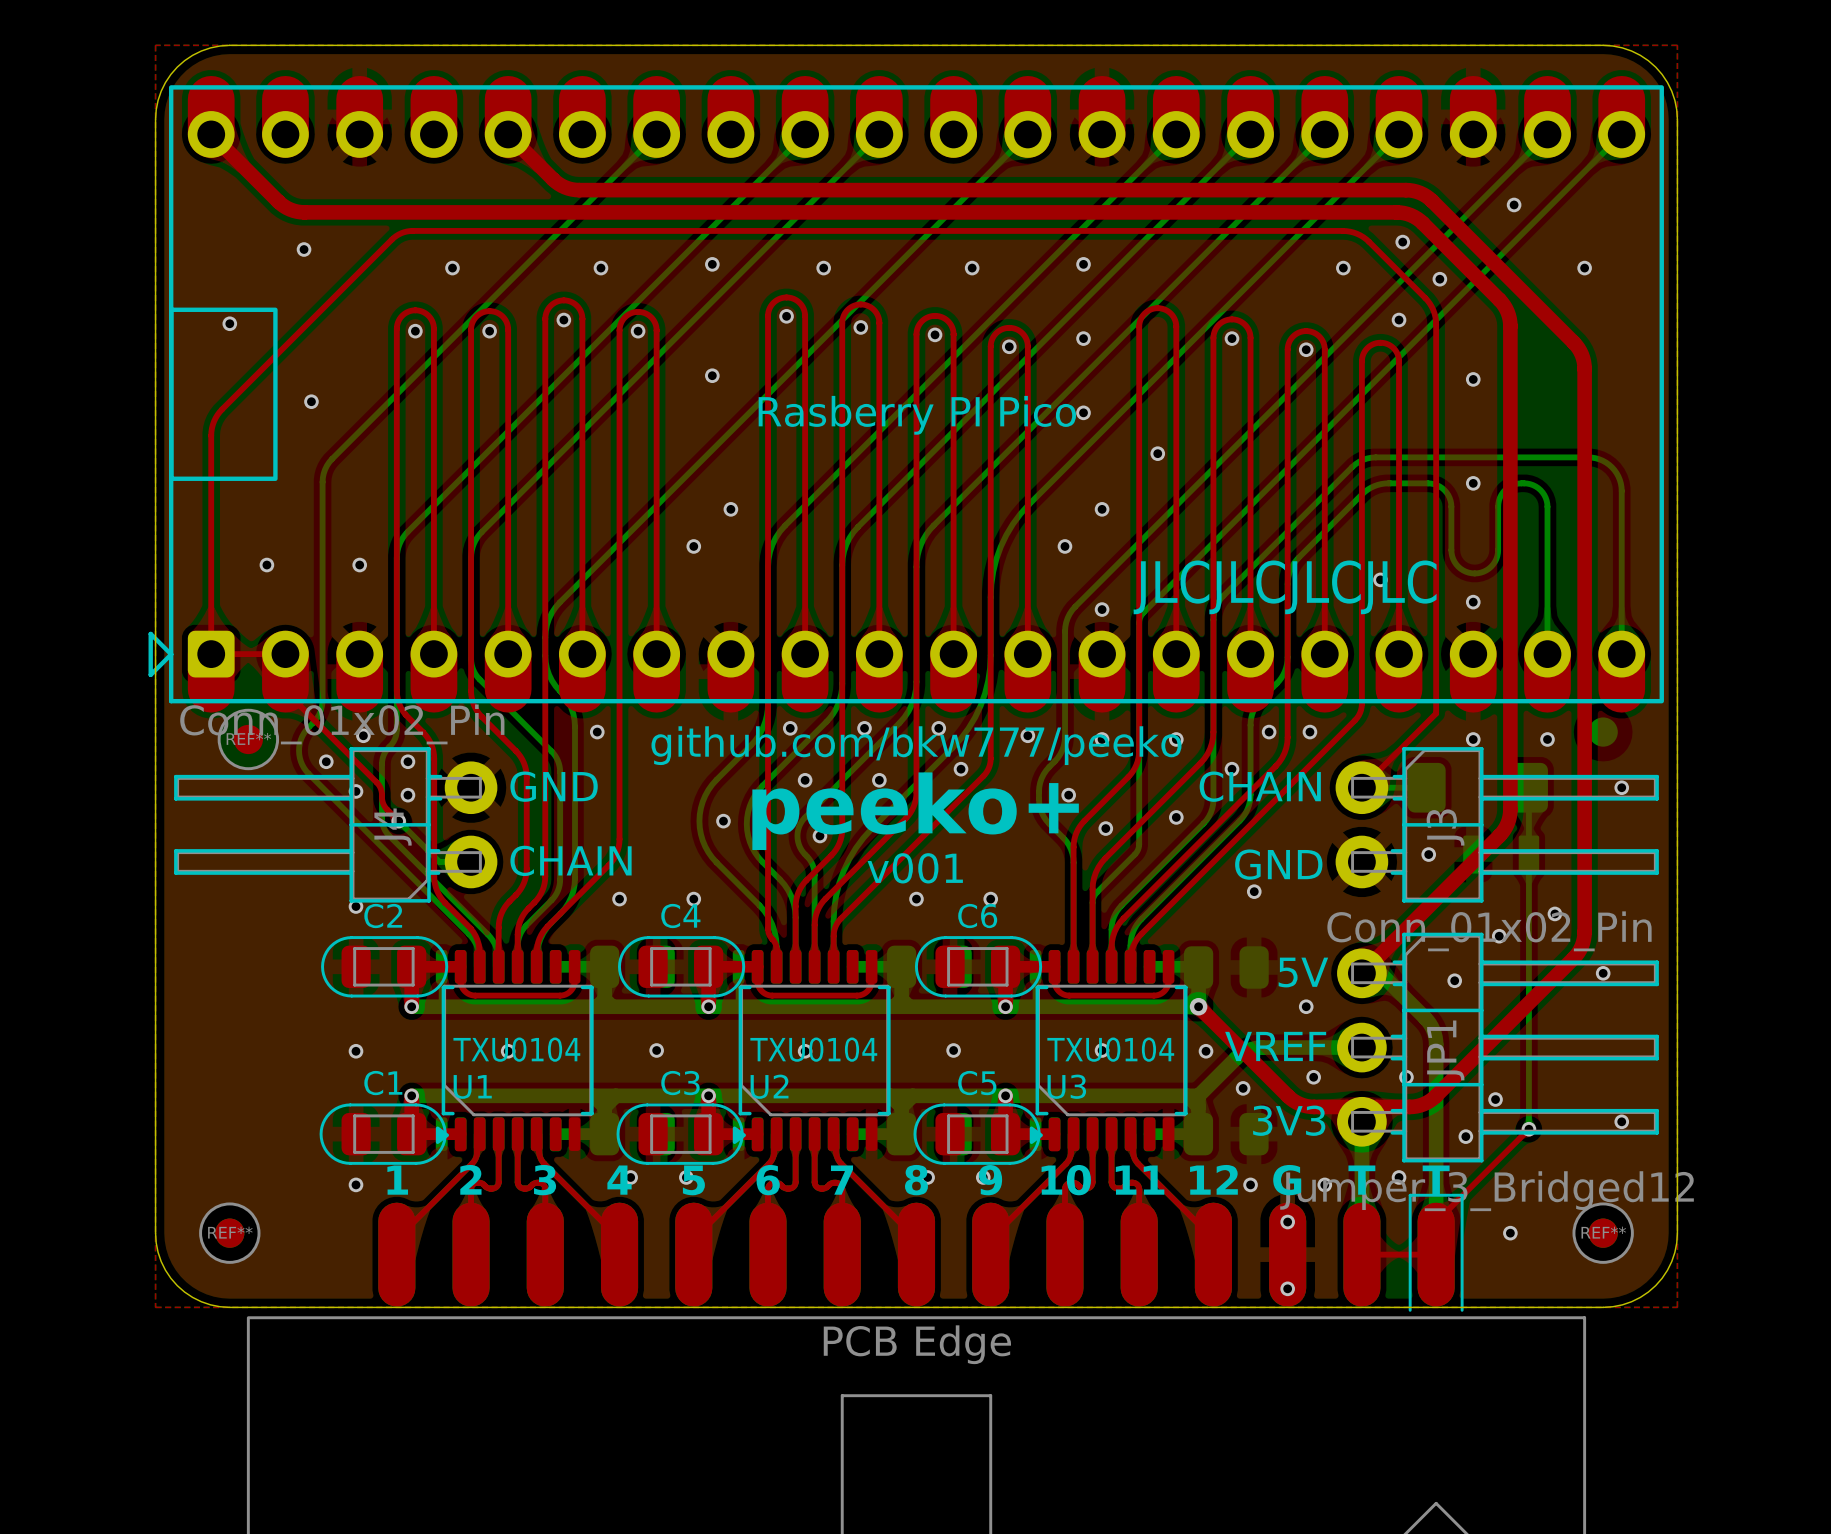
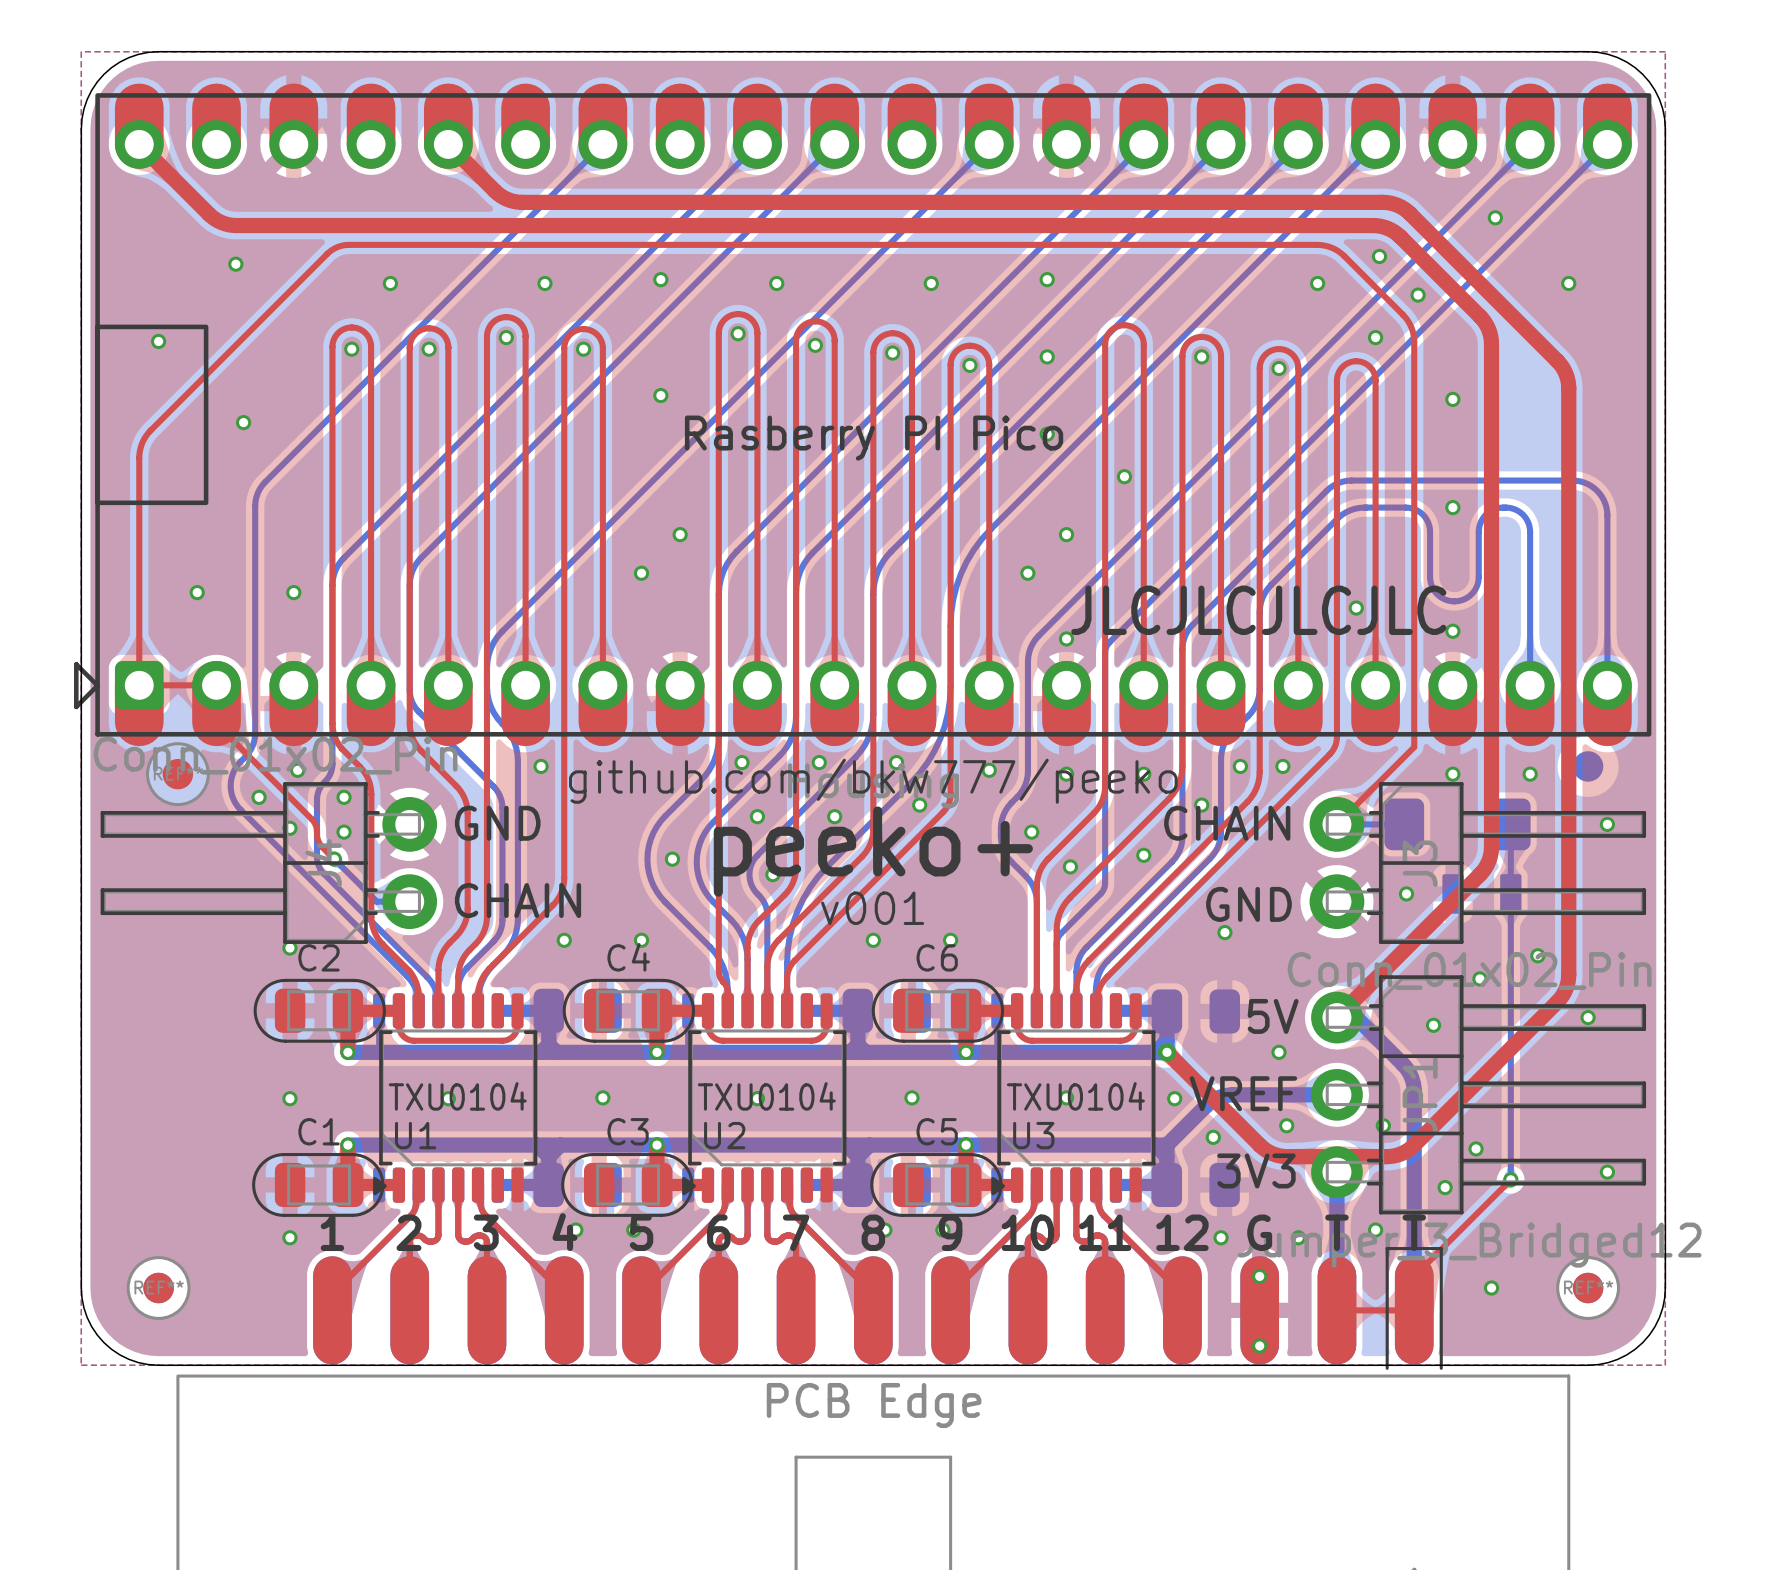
drawing: none -> [787, 763, 959, 809]

